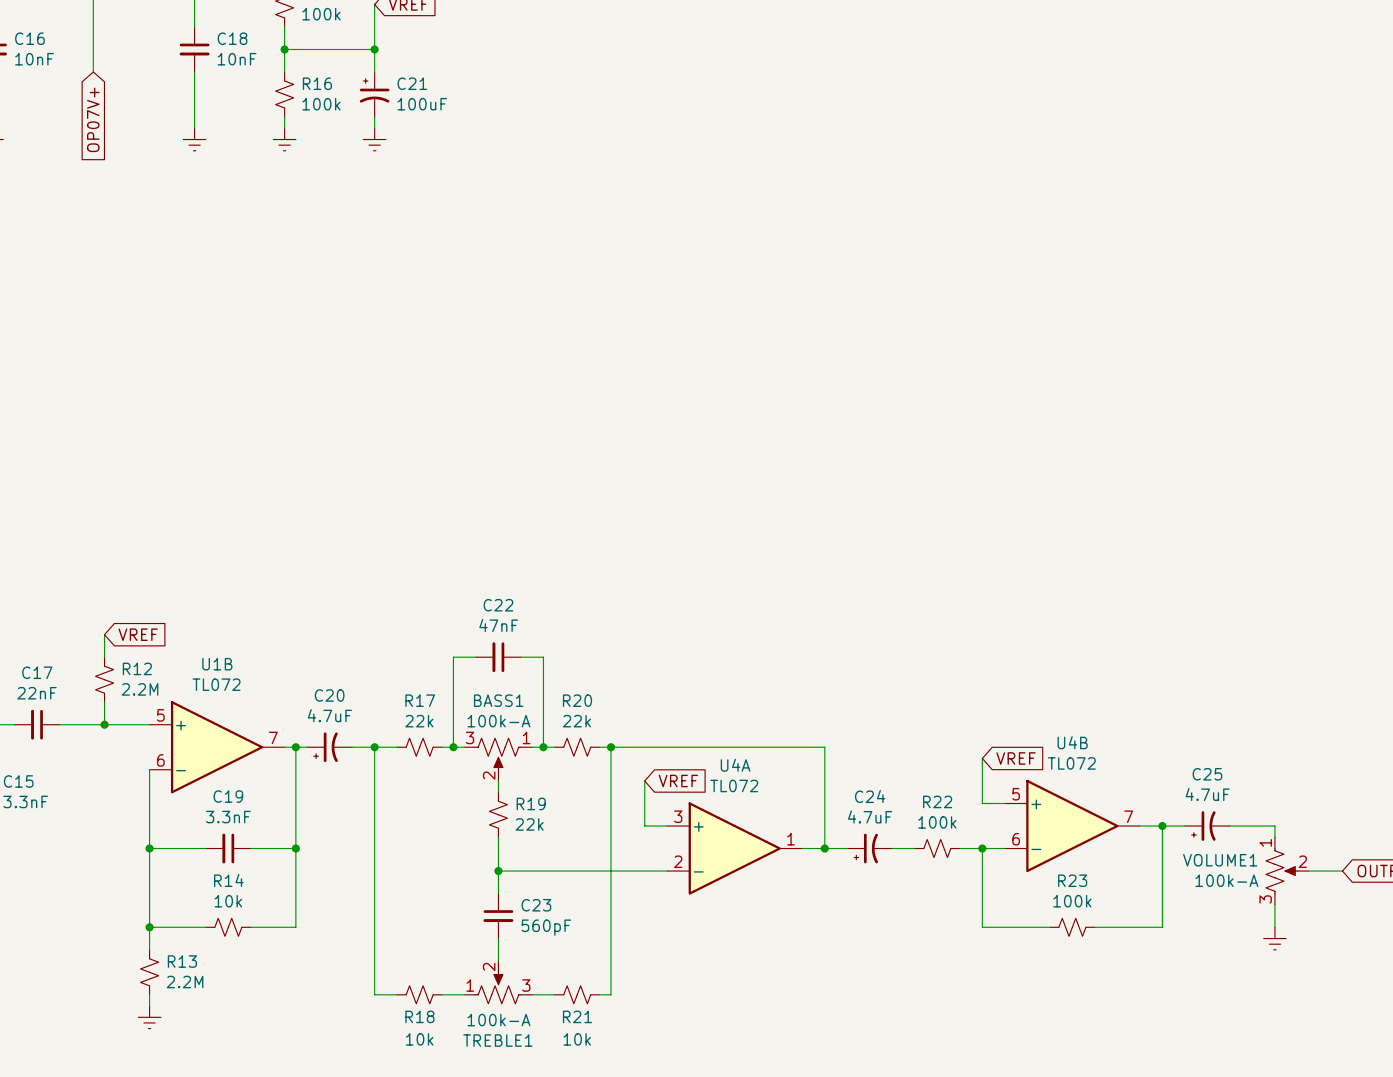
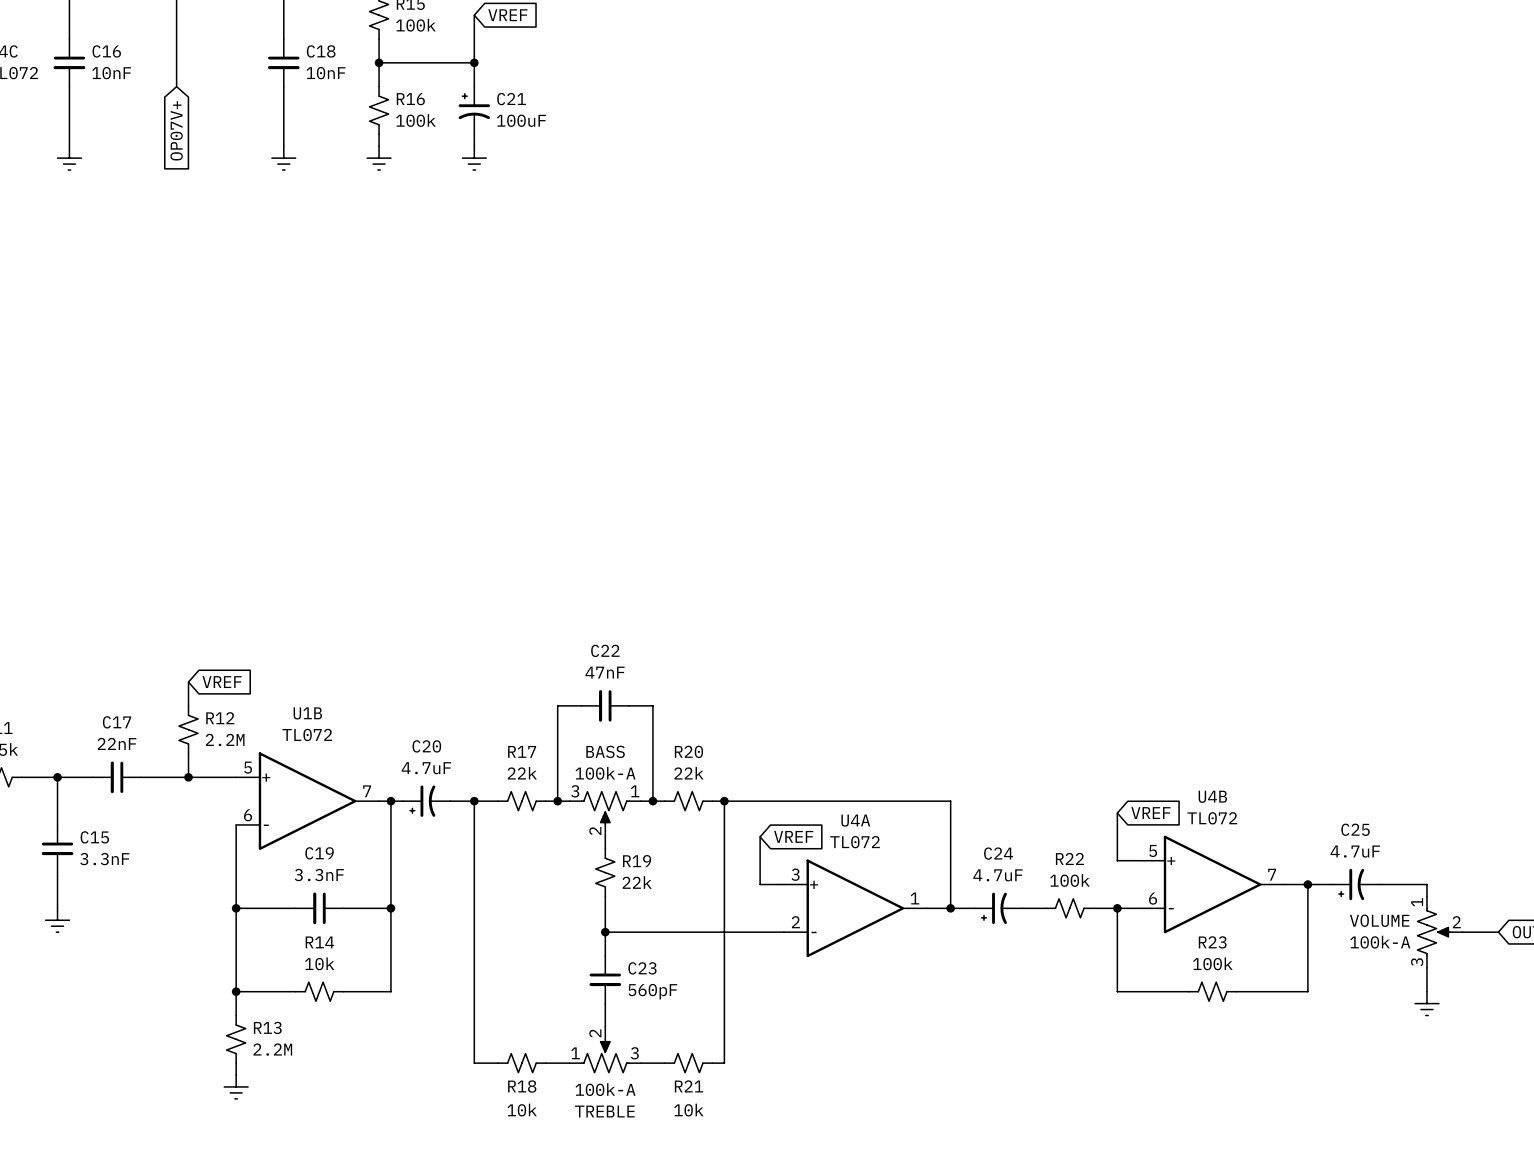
BASS1 name: BASS1 (498, 700) -> BASS (605, 751)
VOLUME1 name: VOLUME1 (1220, 860) -> VOLUME (1379, 920)
TREBLE1 name: TREBLE1 (497, 1040) -> TREBLE (604, 1111)

